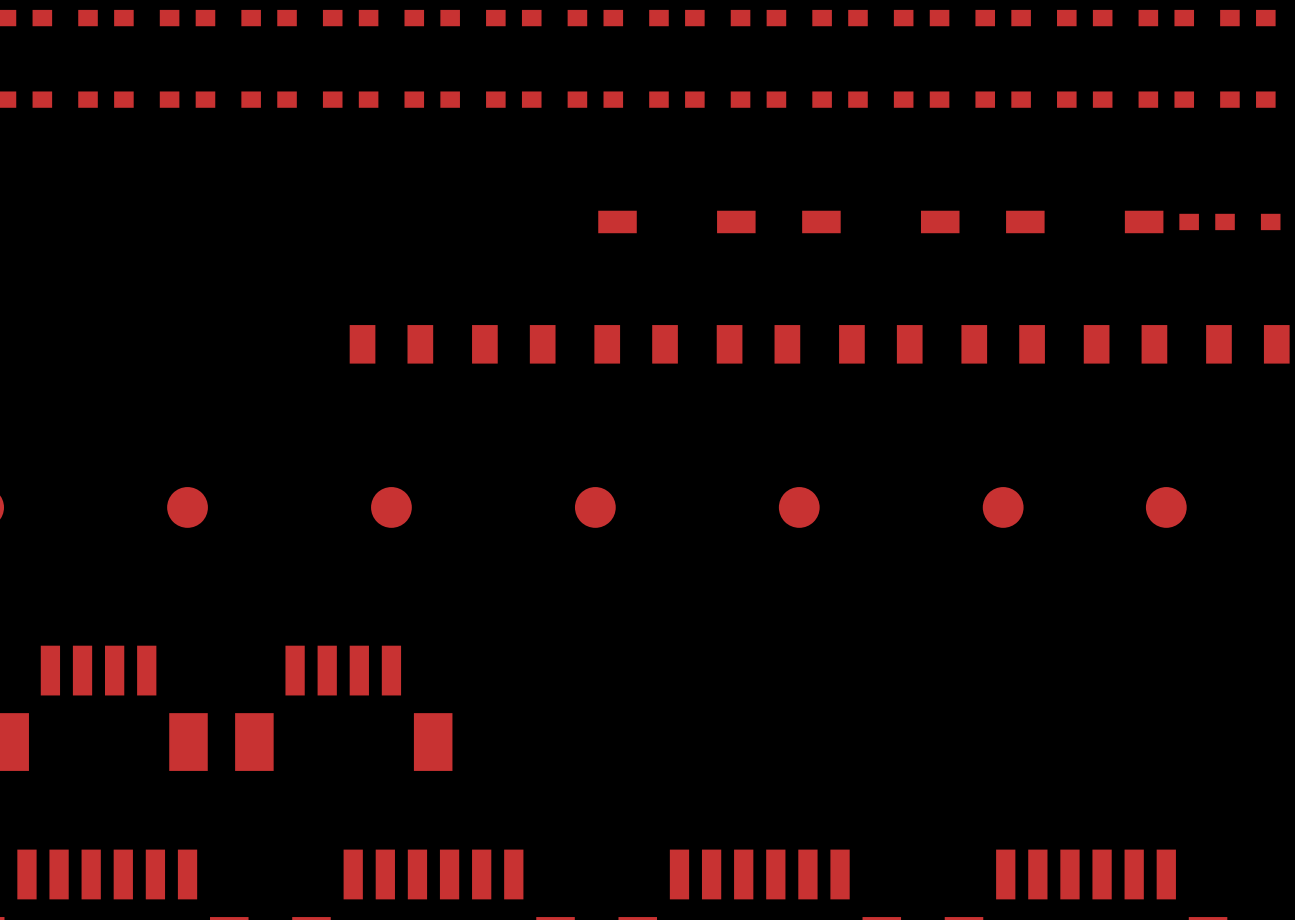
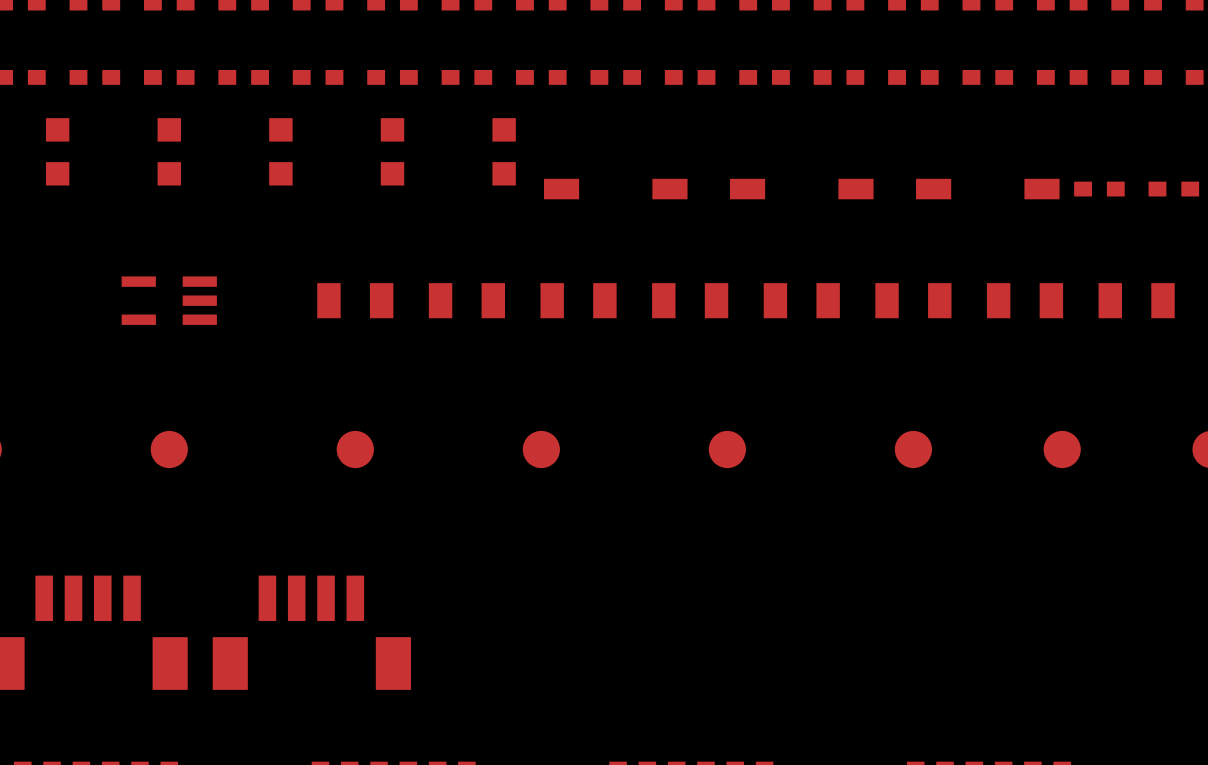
part: none -> (57, 151)
part: none -> (169, 151)
part: none -> (280, 151)
part: none -> (392, 151)
part: none -> (504, 151)
part: none -> (169, 300)

